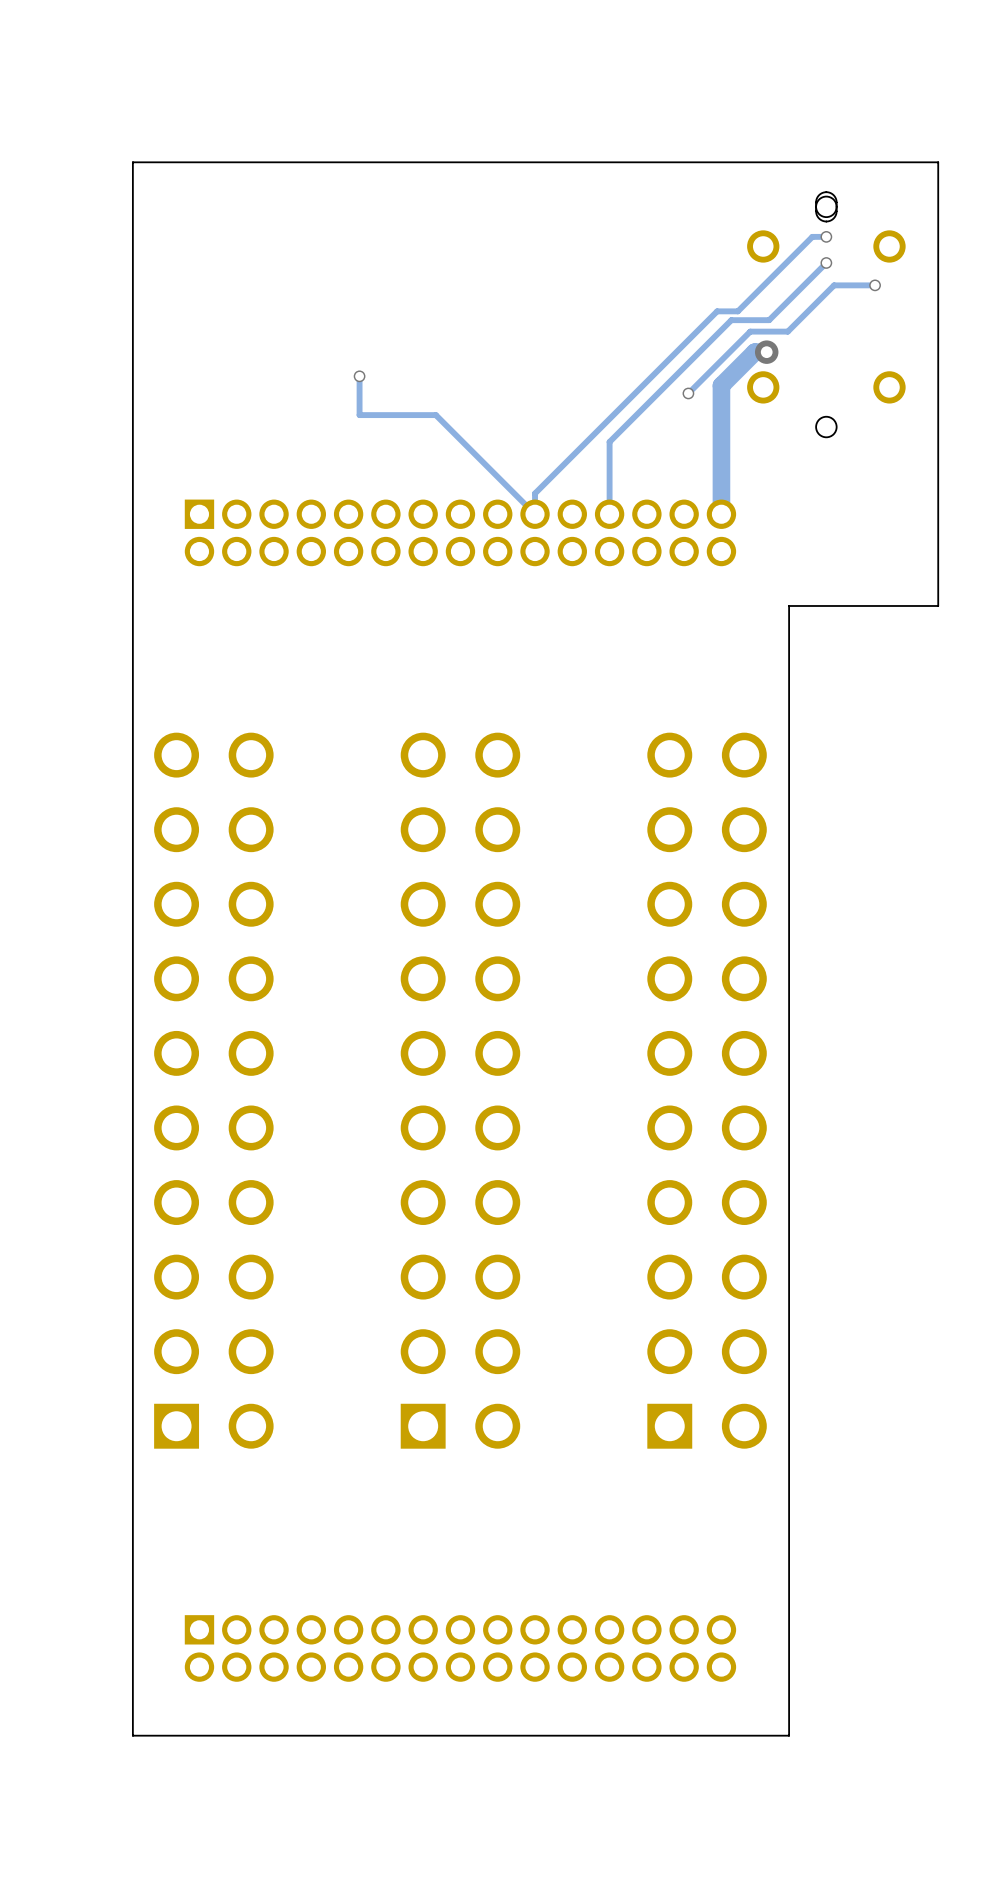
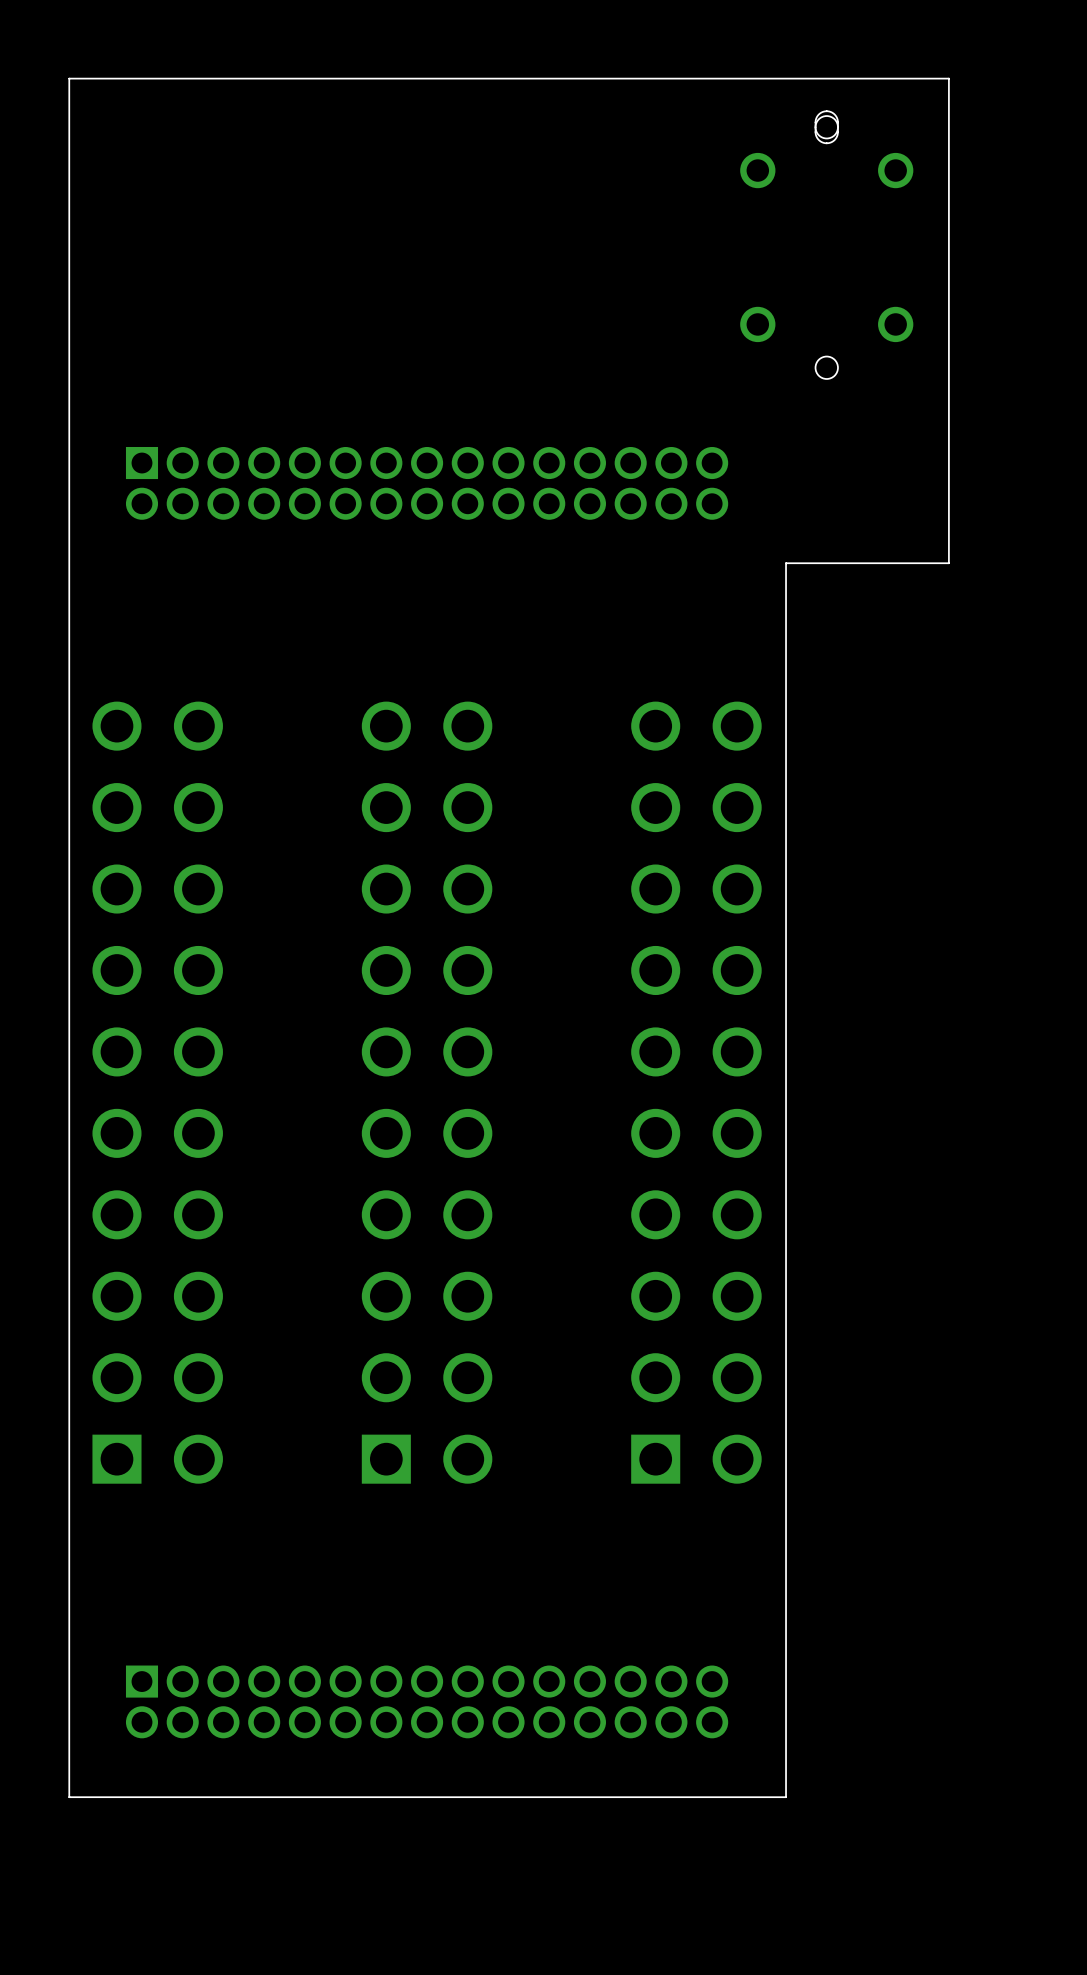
track: (826, 236) (812, 236) (737, 311) (717, 311) (535, 493) (535, 514) (435, 415) (359, 415) (359, 376) -> none
via: (826, 236) -> none
track: (826, 262) (769, 320) (731, 320) (609, 441) (609, 514) -> none
via: (826, 262) -> none
track: (875, 285) (834, 285) (787, 331) (750, 331) (688, 393) -> none
via: (875, 285) -> none
track: (766, 352) (754, 352) (721, 385) (721, 514) -> none
via: (766, 352) -> none
via: (359, 376) -> none
via: (688, 393) -> none

